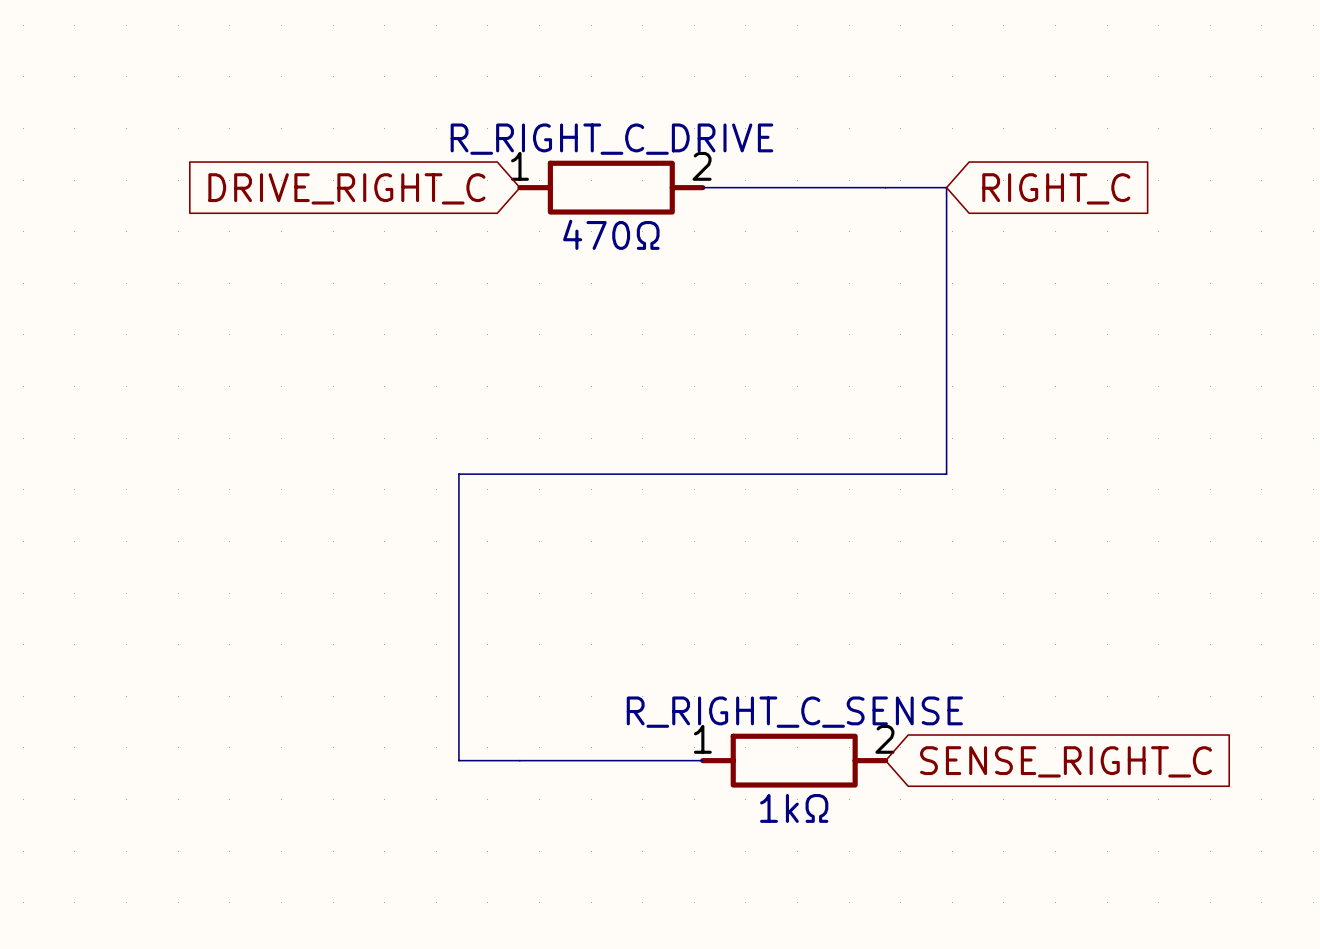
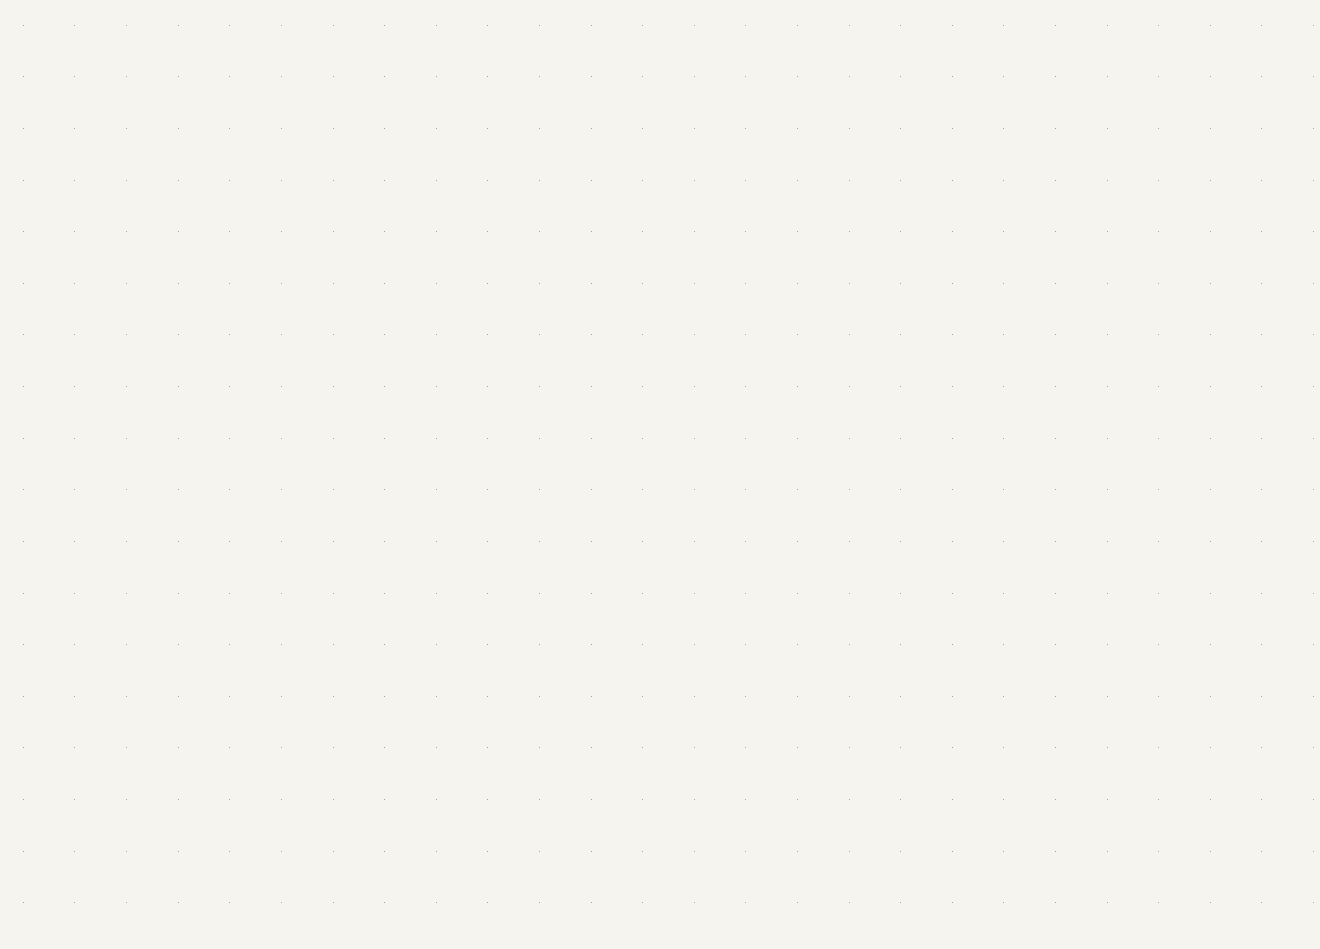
R_RIGHT_C_DRIVE: 470Ω (611, 187) -> none
wire: (702, 187) (946, 187) (946, 474) (458, 474) (458, 760) (702, 760) -> none
global label: DRIVE_RIGHT_C (346, 188) -> none
global label: RIGHT_C (1056, 188) -> none
R_RIGHT_C_SENSE: 1kΩ (794, 760) -> none
global label: SENSE_RIGHT_C (1066, 761) -> none

